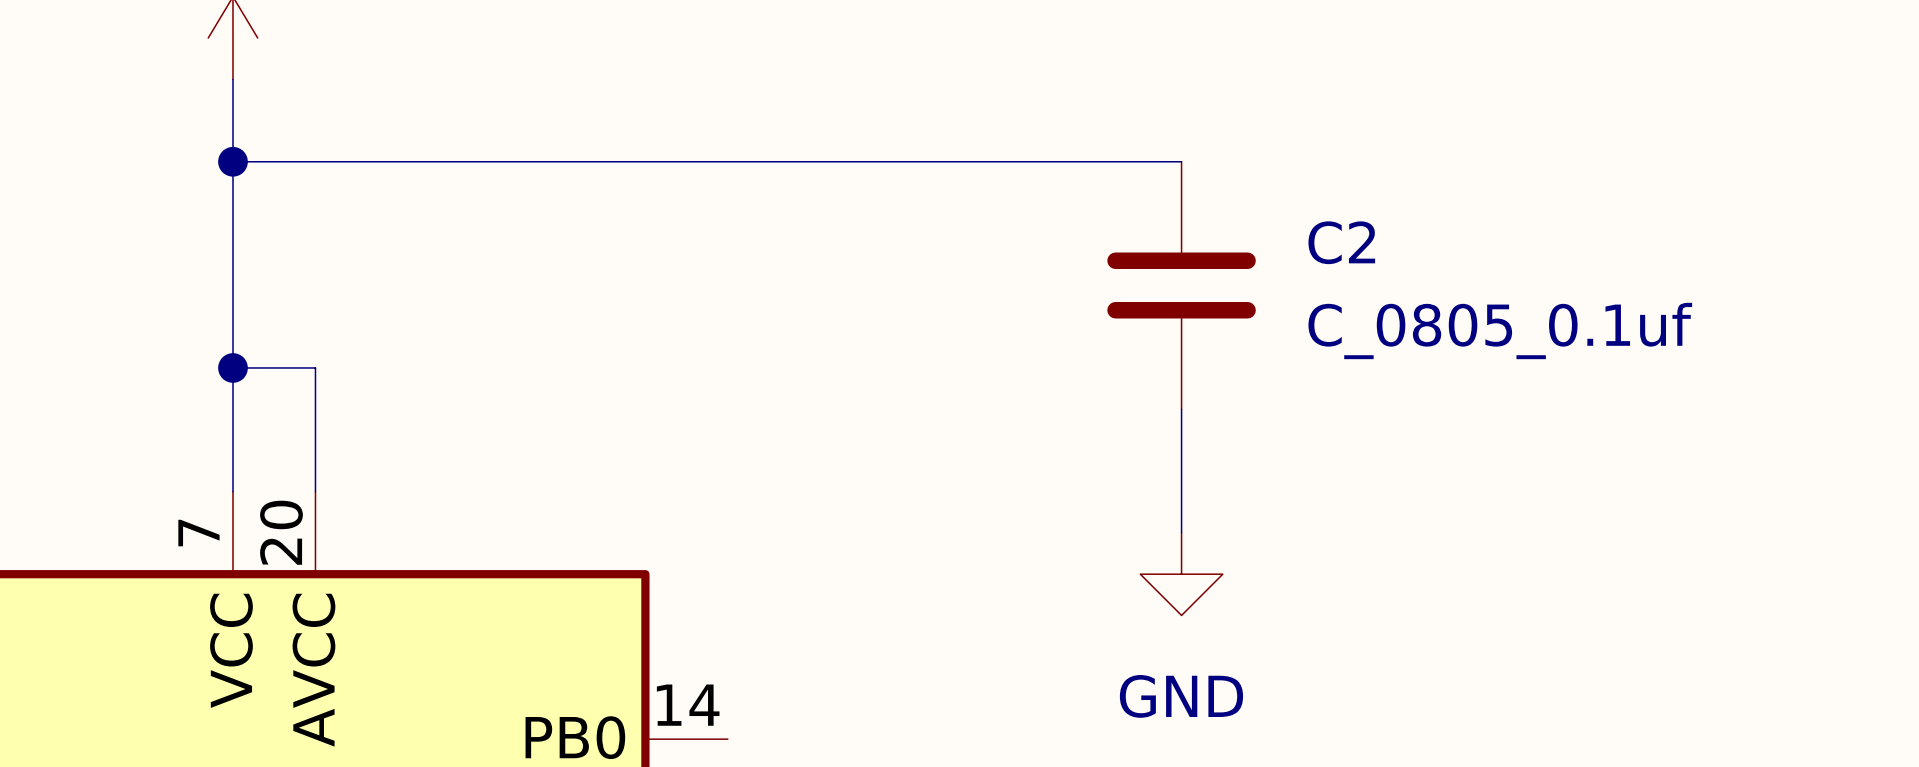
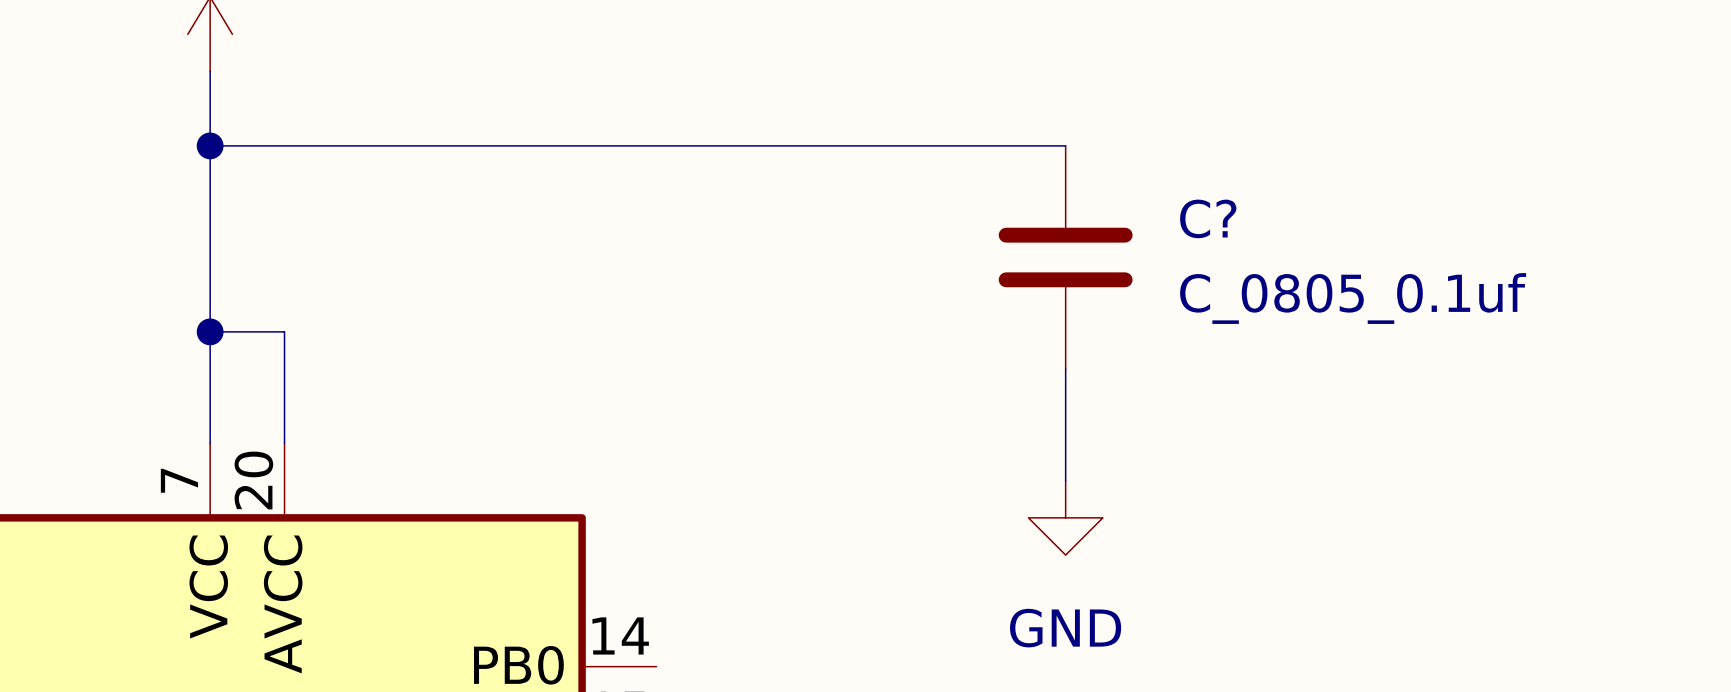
C2 name: C2 (1341, 242) -> C? (1208, 218)

